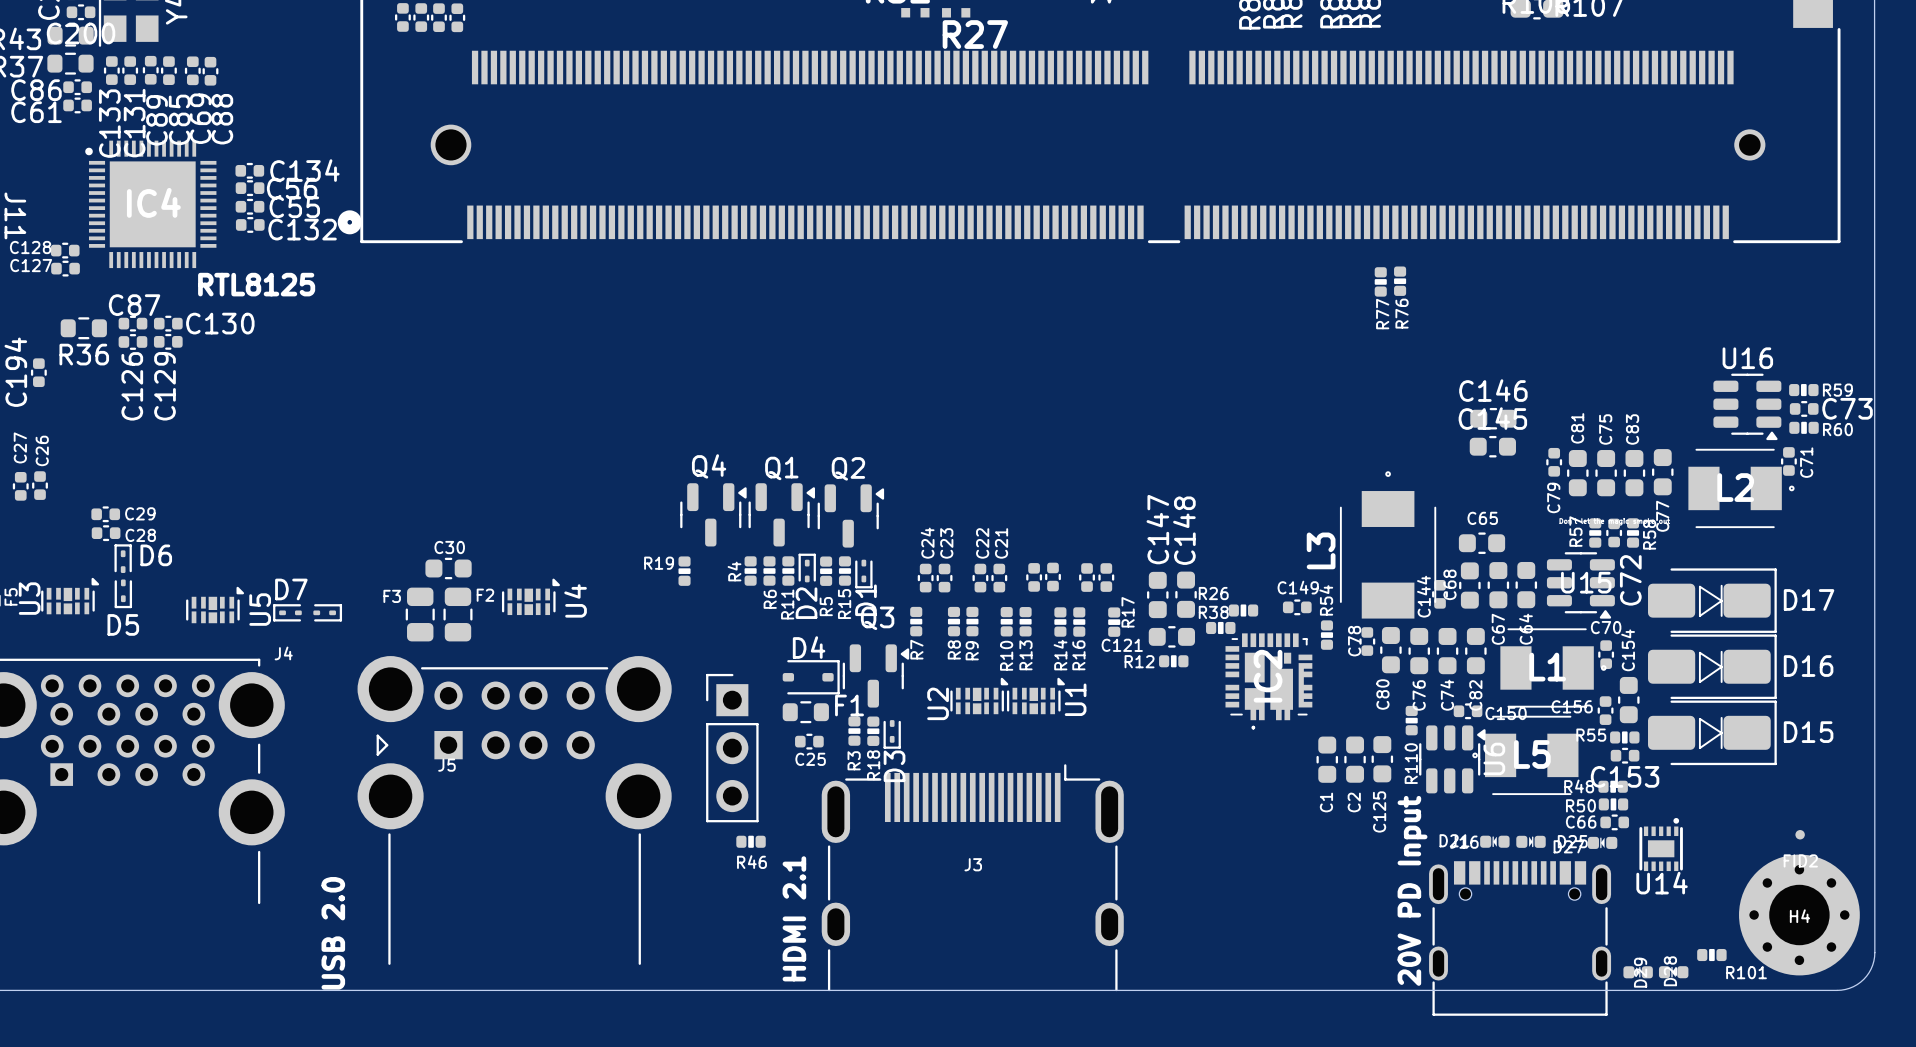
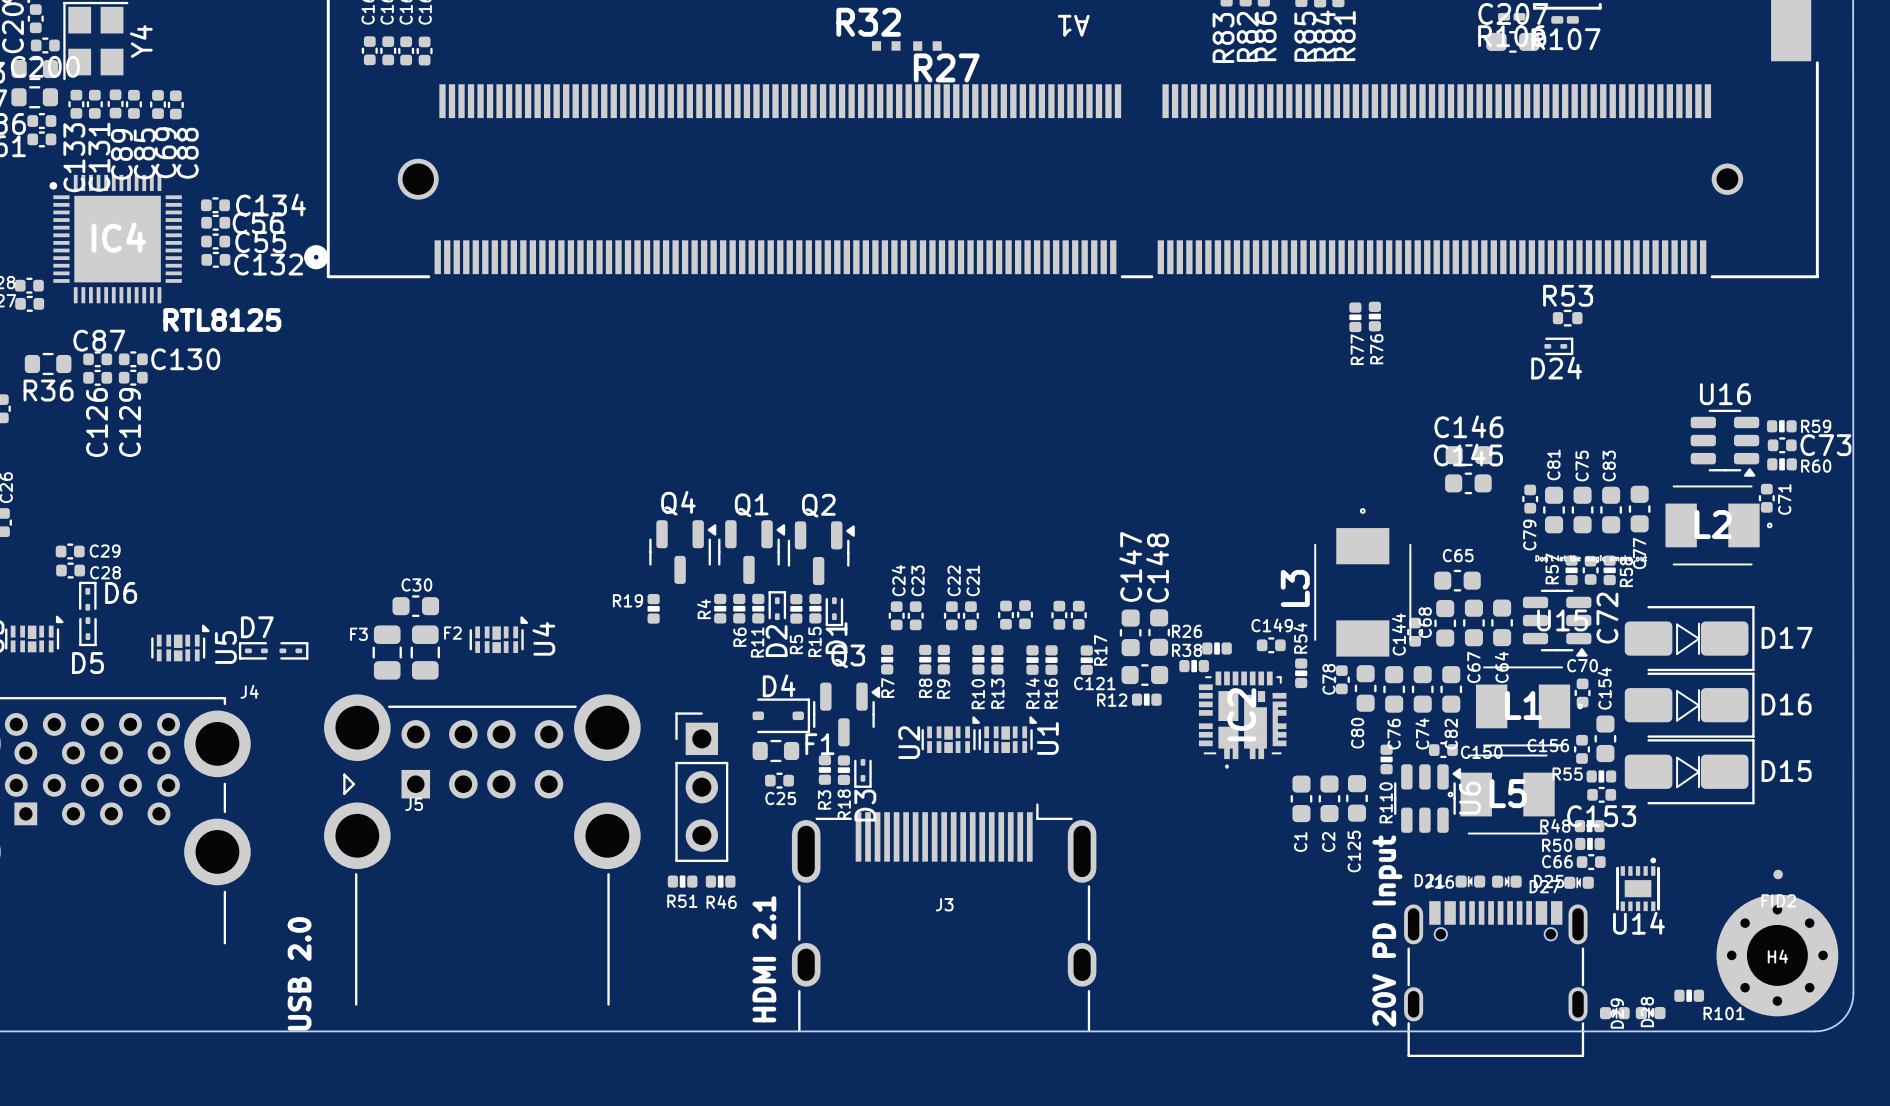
R53: none -> (1567, 318)
D24: none -> (1558, 346)
R51: none -> (682, 881)

